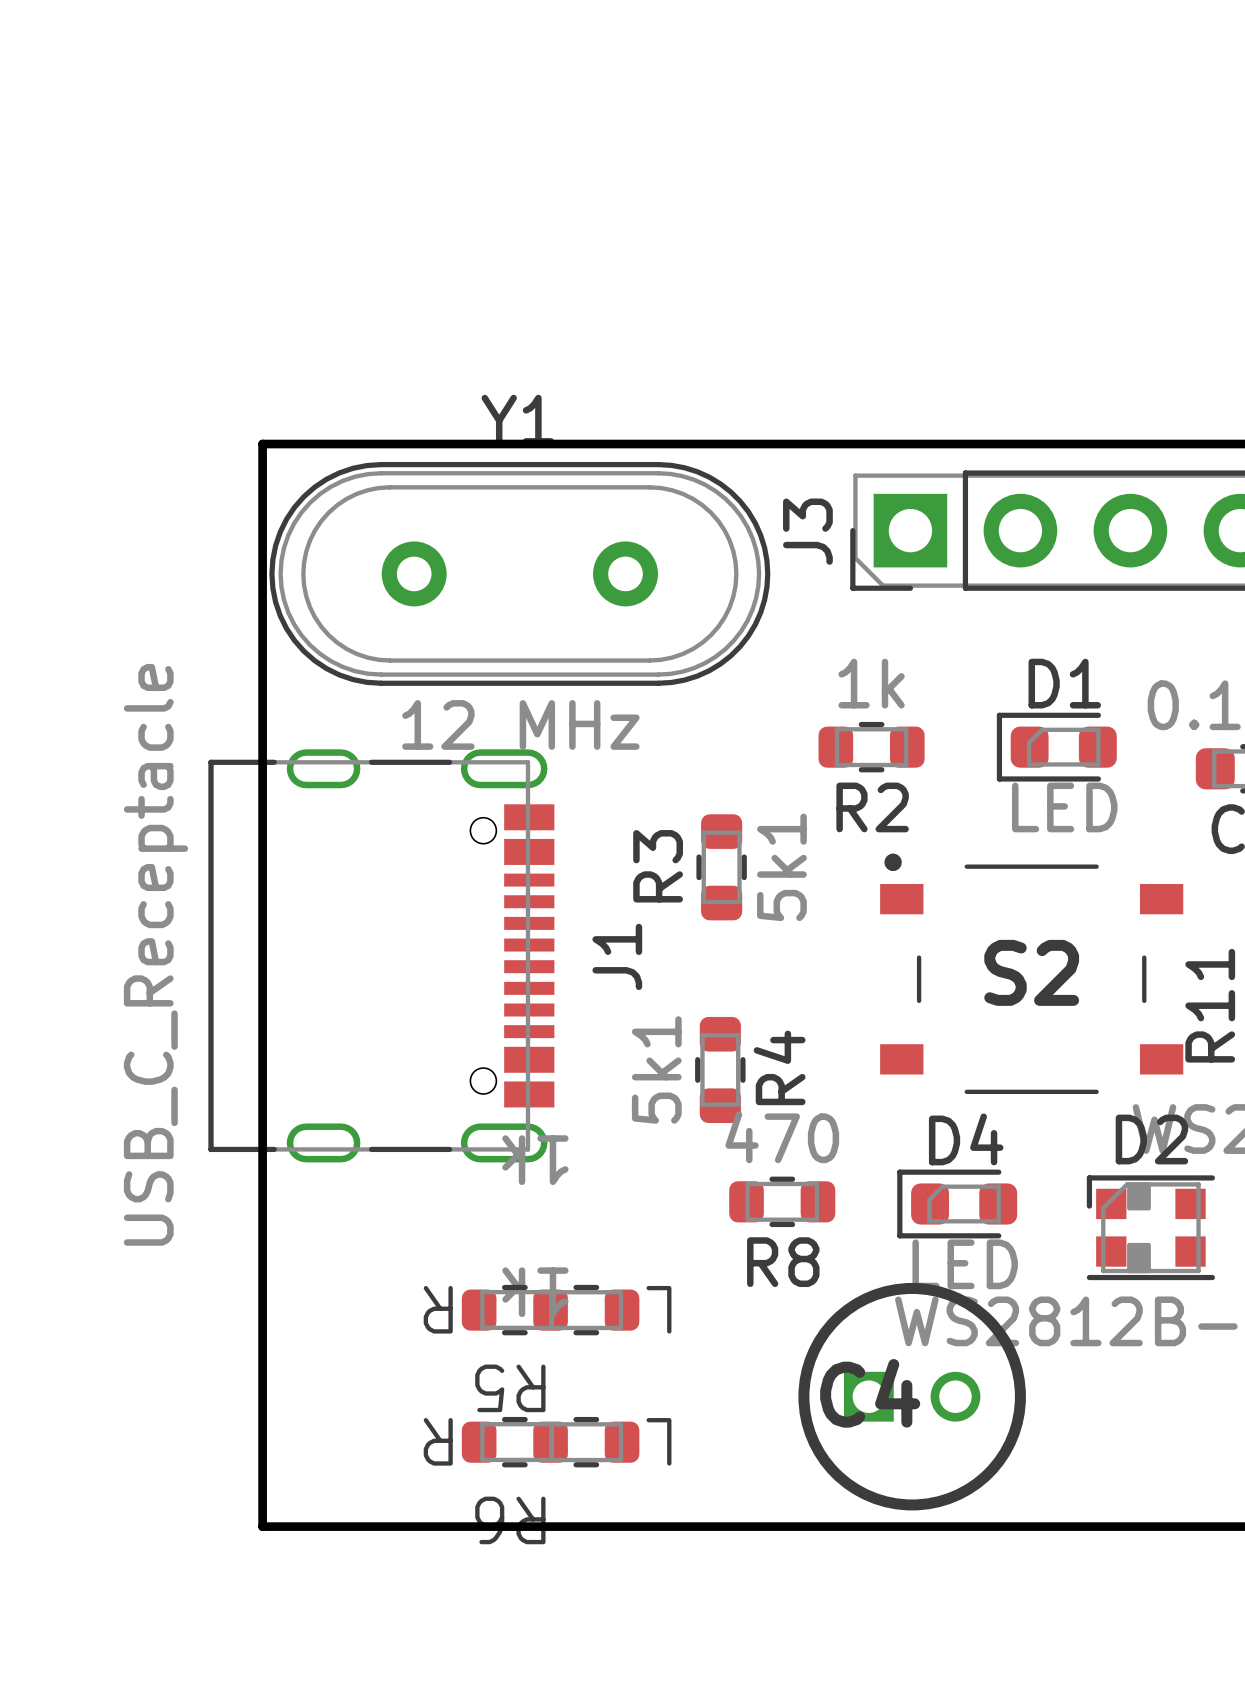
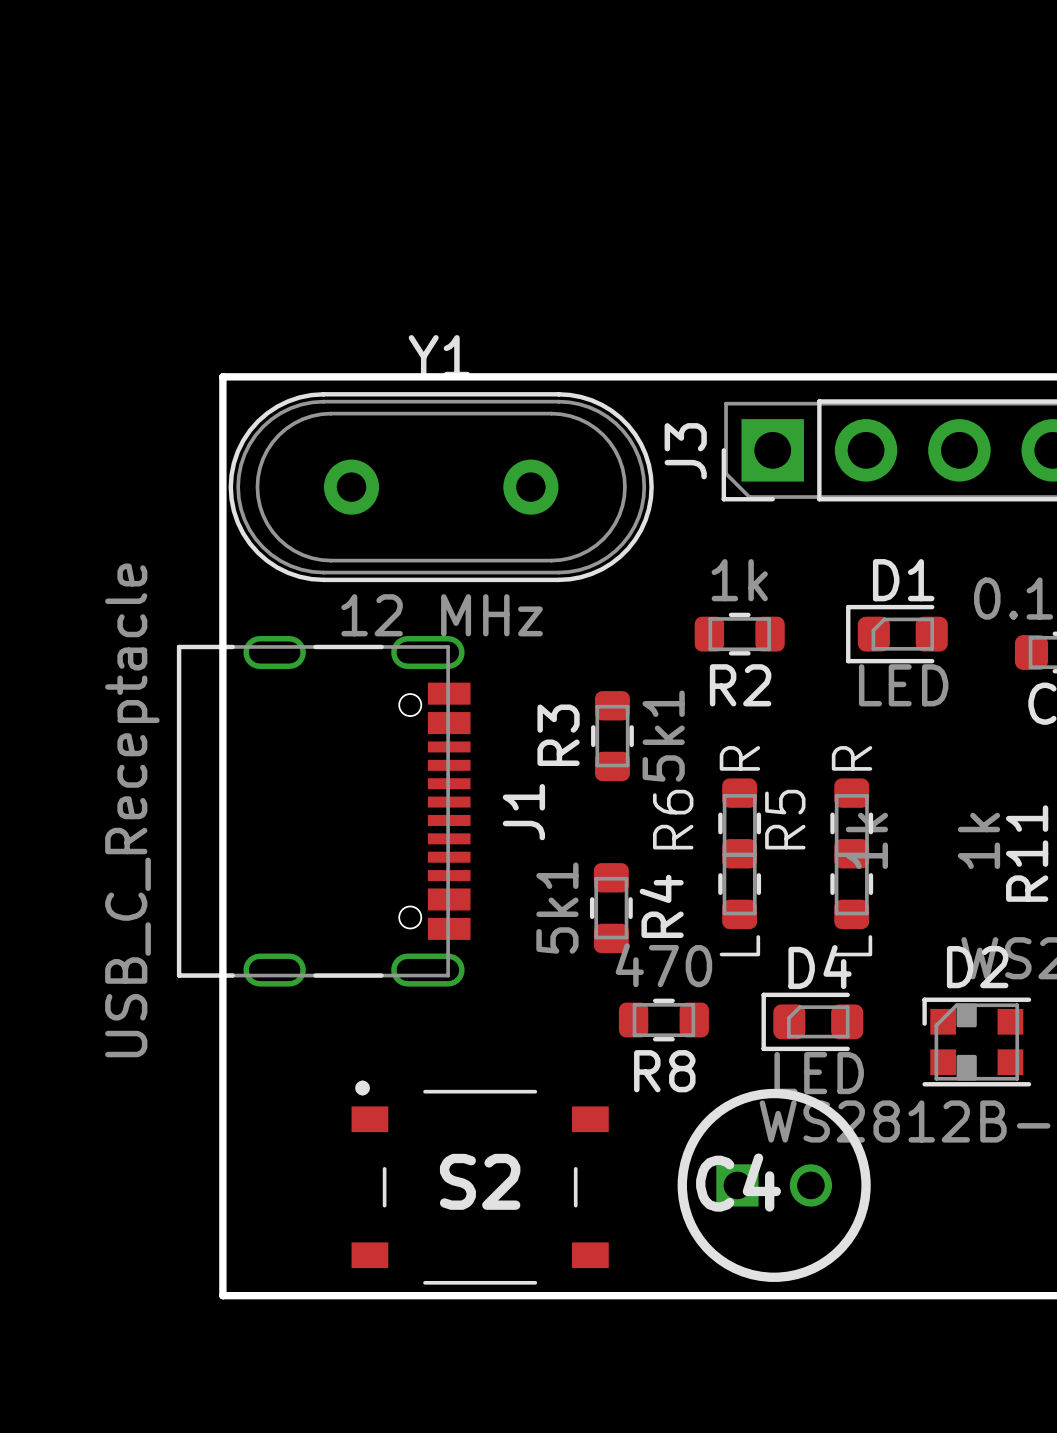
S2 position: (1031, 973) -> (480, 1182)
R5 rotation: 0° (550, 1310) -> 90° clockwise (851, 853)
R5 position: (550, 1310) -> (851, 853)
R6 rotation: 0° (550, 1442) -> 90° clockwise (739, 853)
R6 position: (550, 1442) -> (739, 853)

